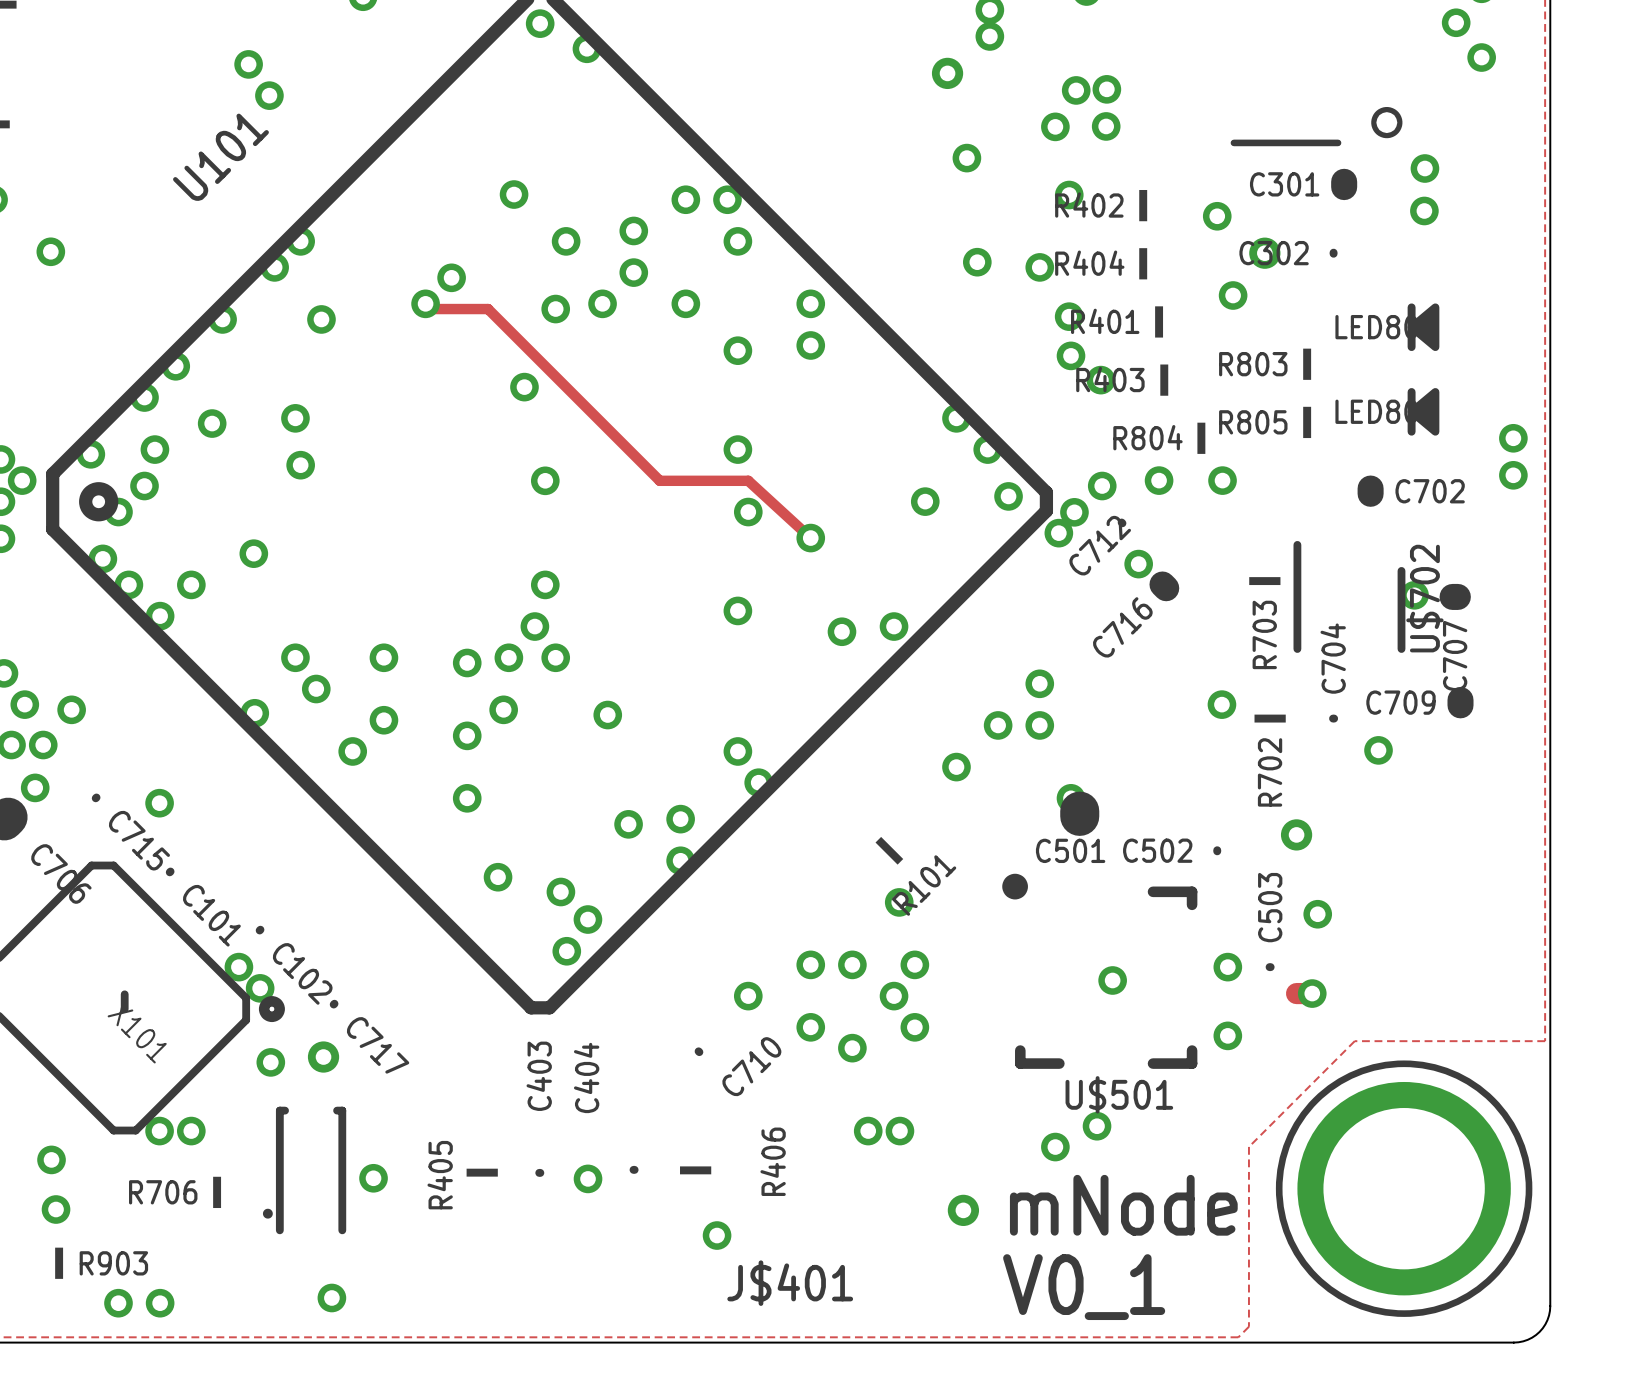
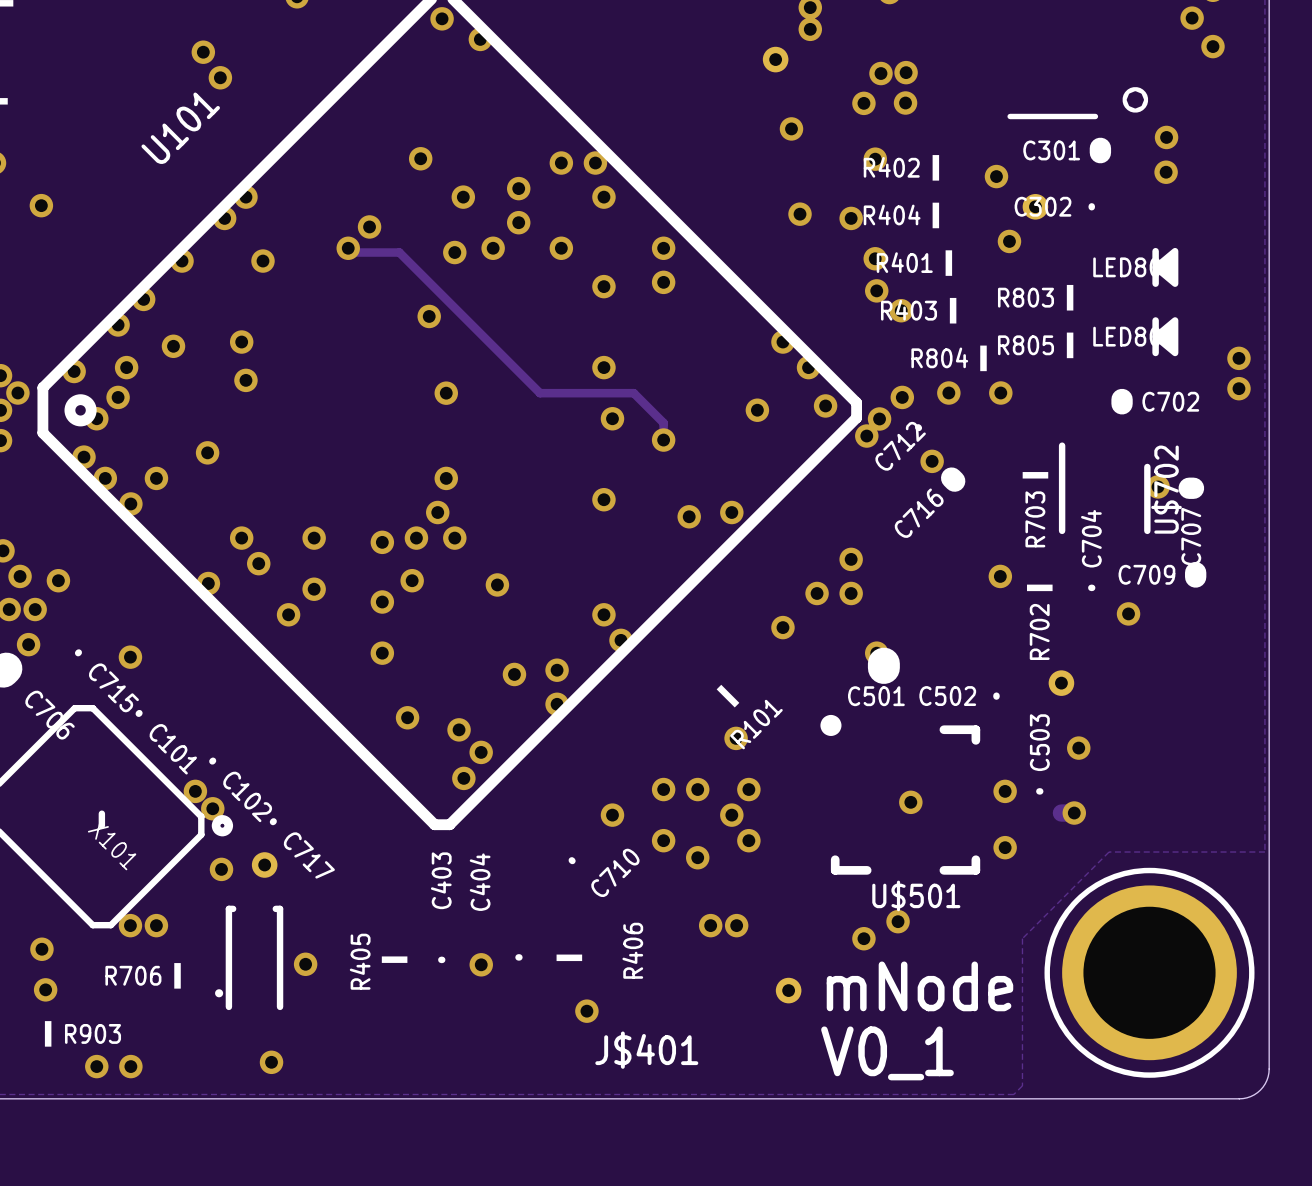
track: (748, 480) (810, 538) -> (612, 393) (633, 393) (663, 423) (663, 440)

